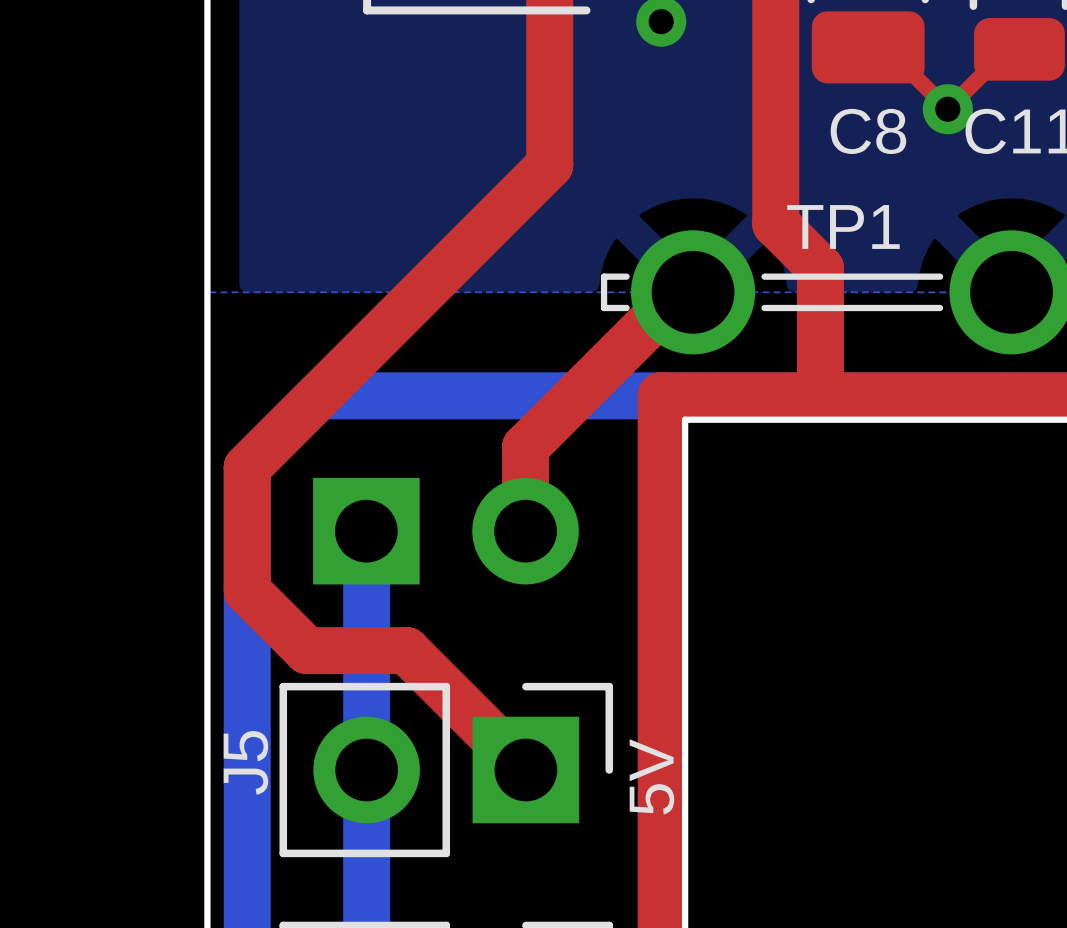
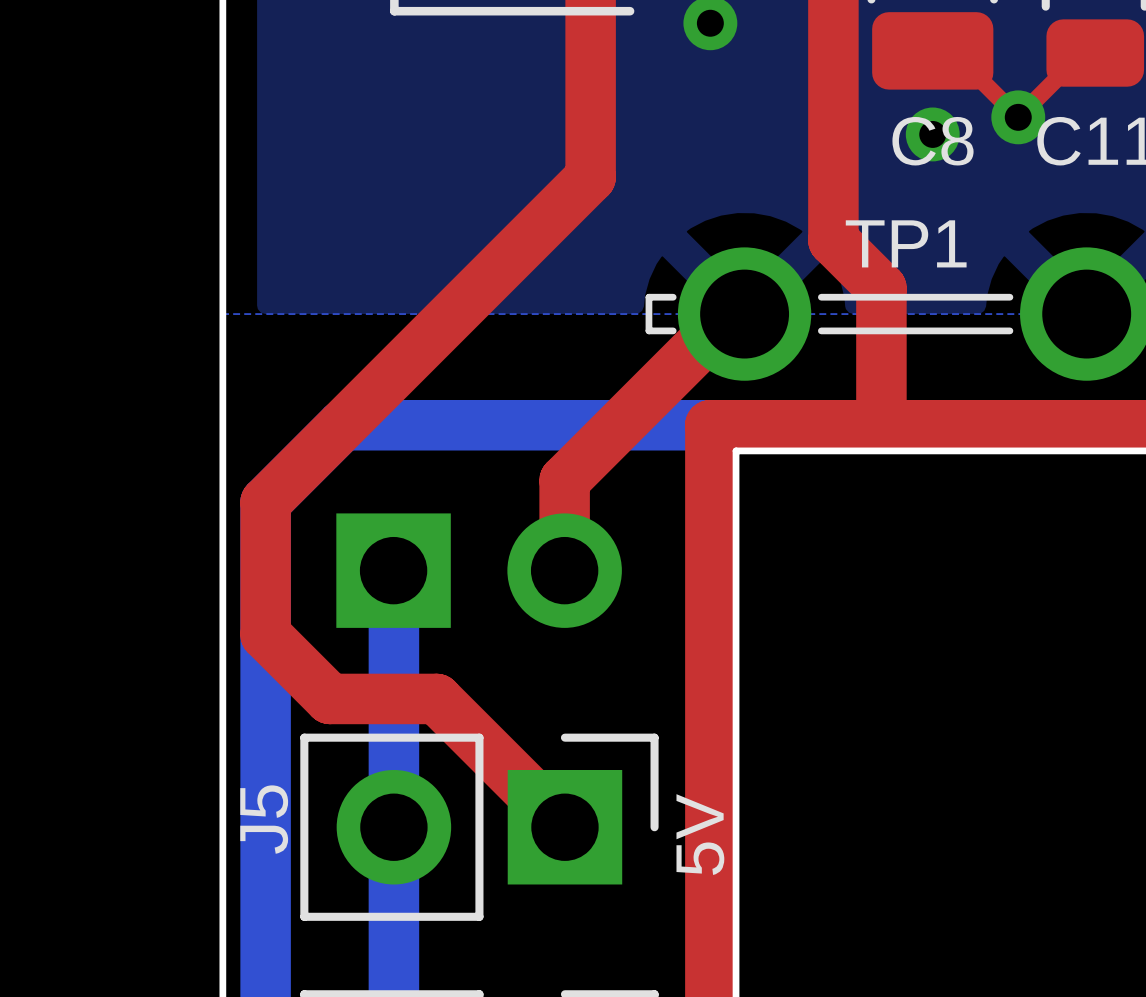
via: none -> (932, 134)

